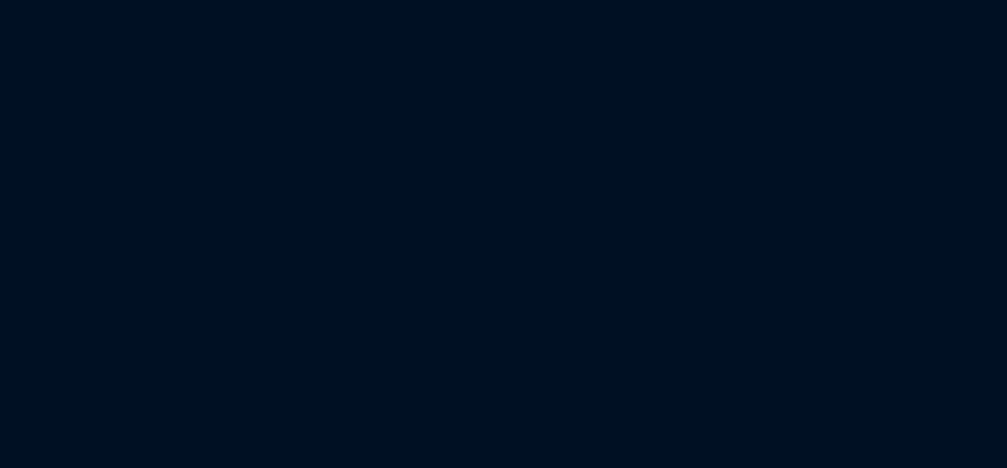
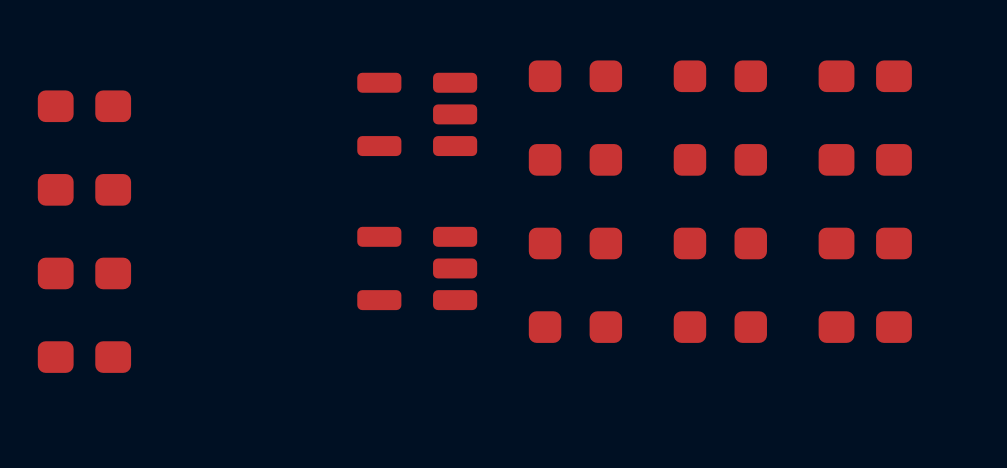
part: none -> (575, 76)
part: none -> (720, 76)
part: none -> (865, 76)
part: none -> (84, 106)
part: none -> (417, 114)
part: none -> (575, 159)
part: none -> (720, 159)
part: none -> (865, 159)
part: none -> (84, 189)
part: none -> (575, 243)
part: none -> (720, 243)
part: none -> (865, 243)
part: none -> (417, 268)
part: none -> (84, 273)
part: none -> (575, 327)
part: none -> (720, 327)
part: none -> (865, 327)
part: none -> (84, 357)

